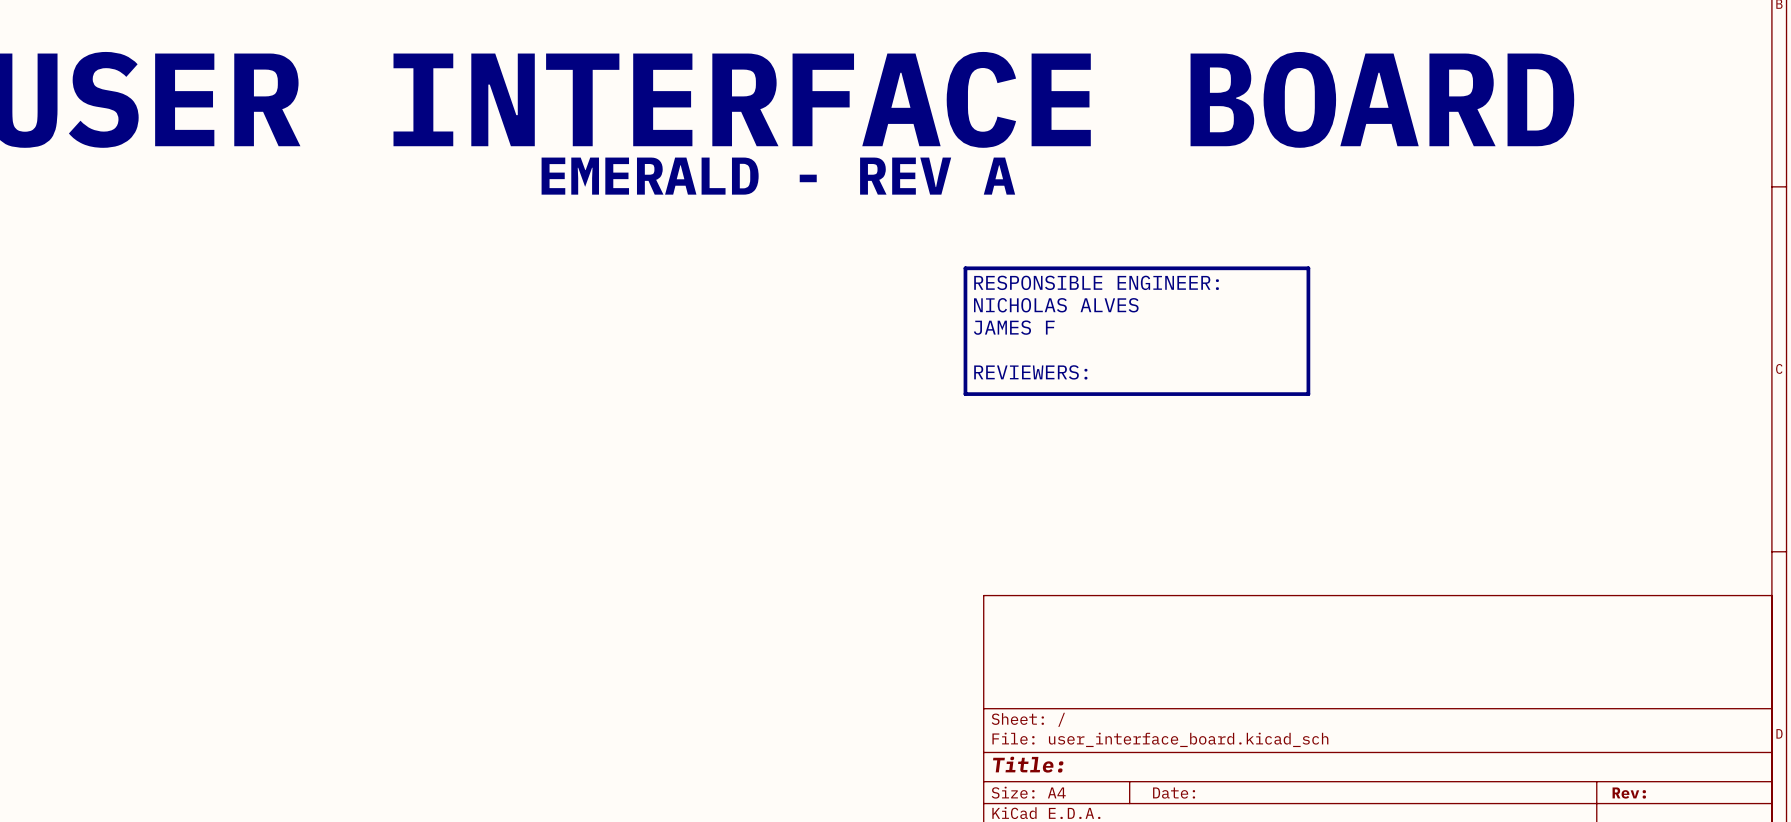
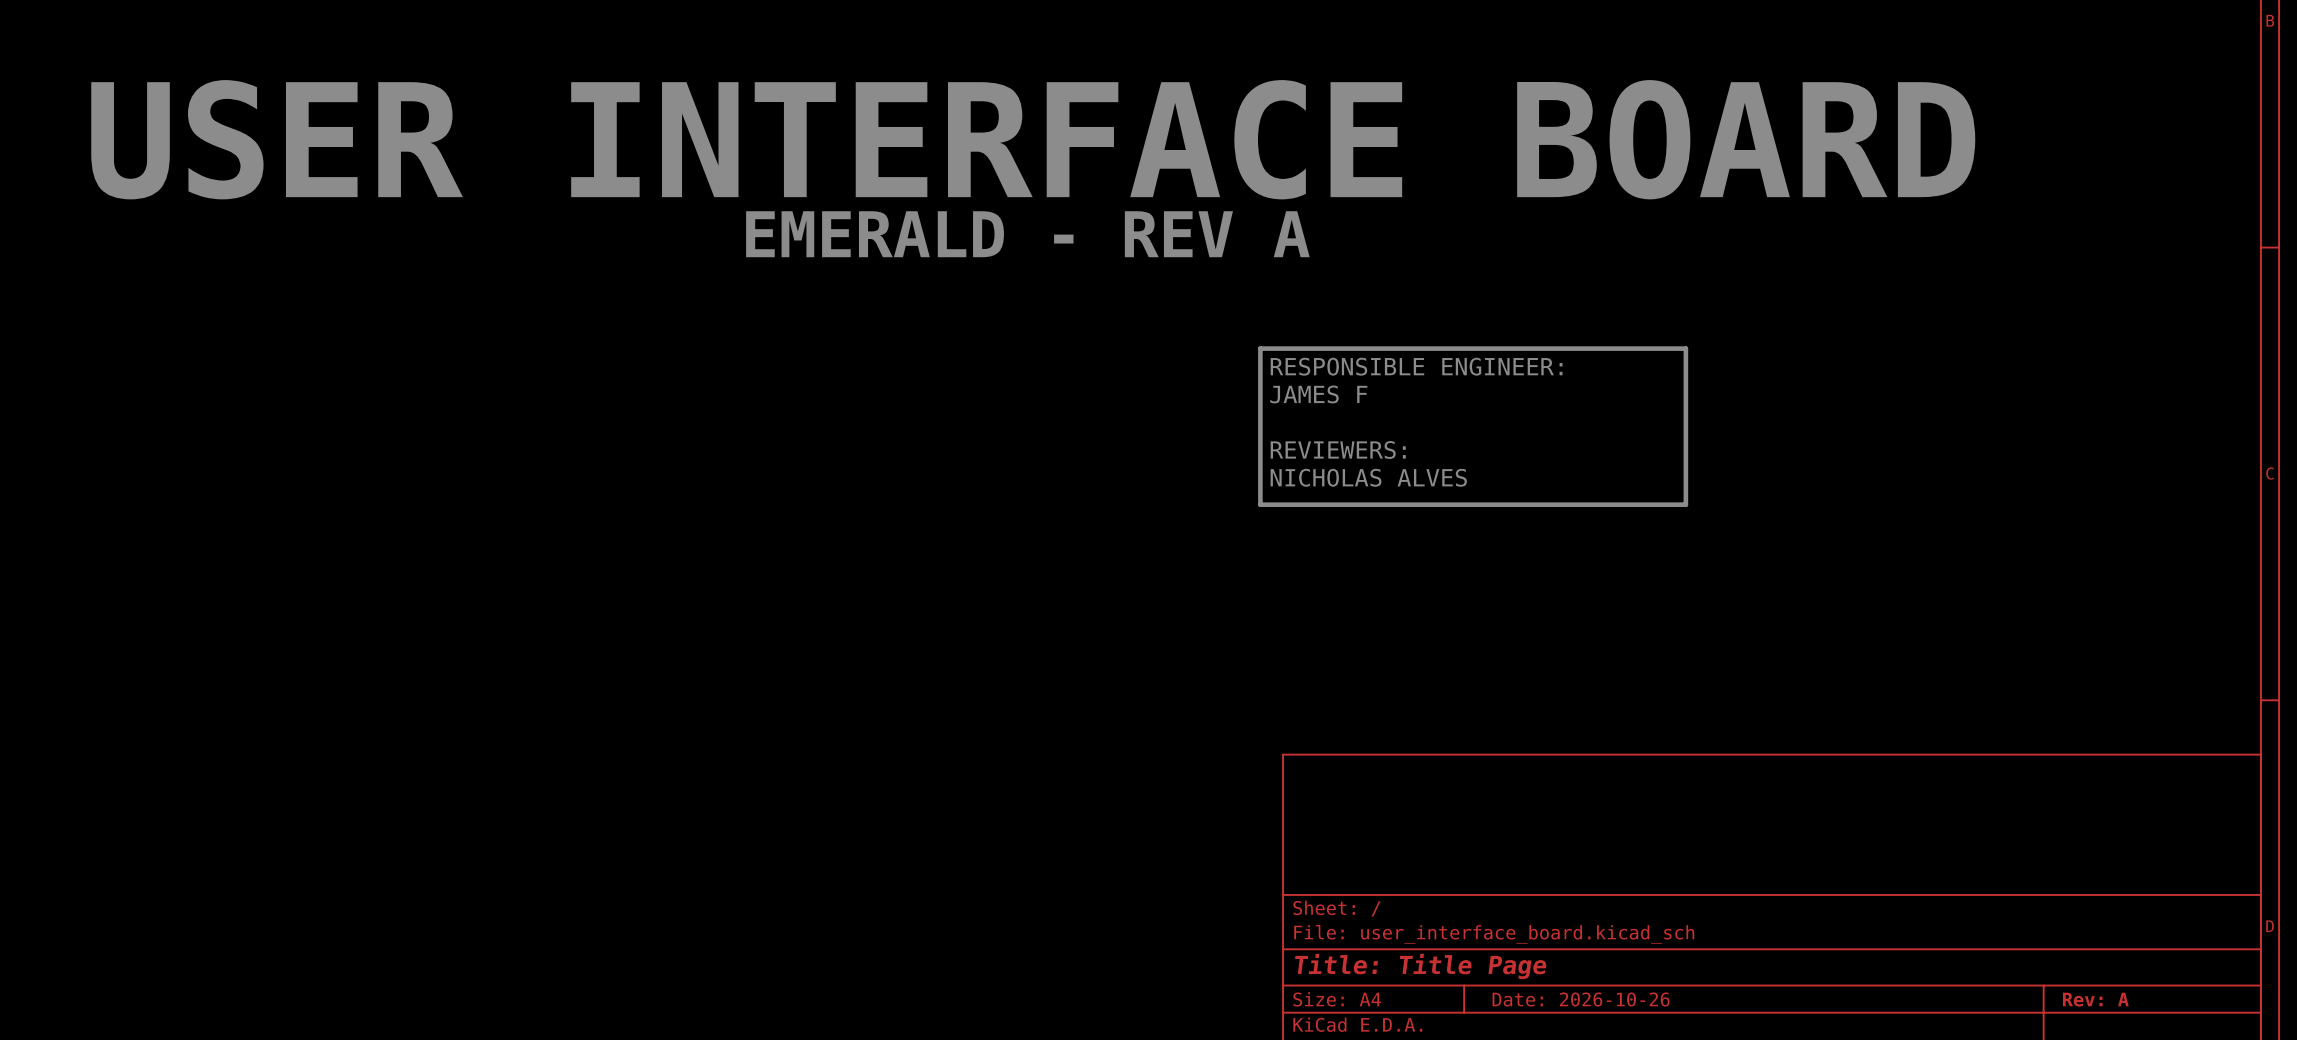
text: NICHOLAS ALVES (1056, 305) -> JAMES F (1318, 394)
text: JAMES F (1014, 327) -> none
text: none -> REVIEWERS: (1338, 449)
text: REVIEWERS: (1030, 372) -> NICHOLAS ALVES (1368, 477)
title block: Title: (1028, 764) -> Title: Title Page (1420, 966)
title block: Date: (1174, 793) -> Date: 2026-10-26 (1581, 999)
title block: Rev: (1629, 793) -> Rev: A (2095, 999)

